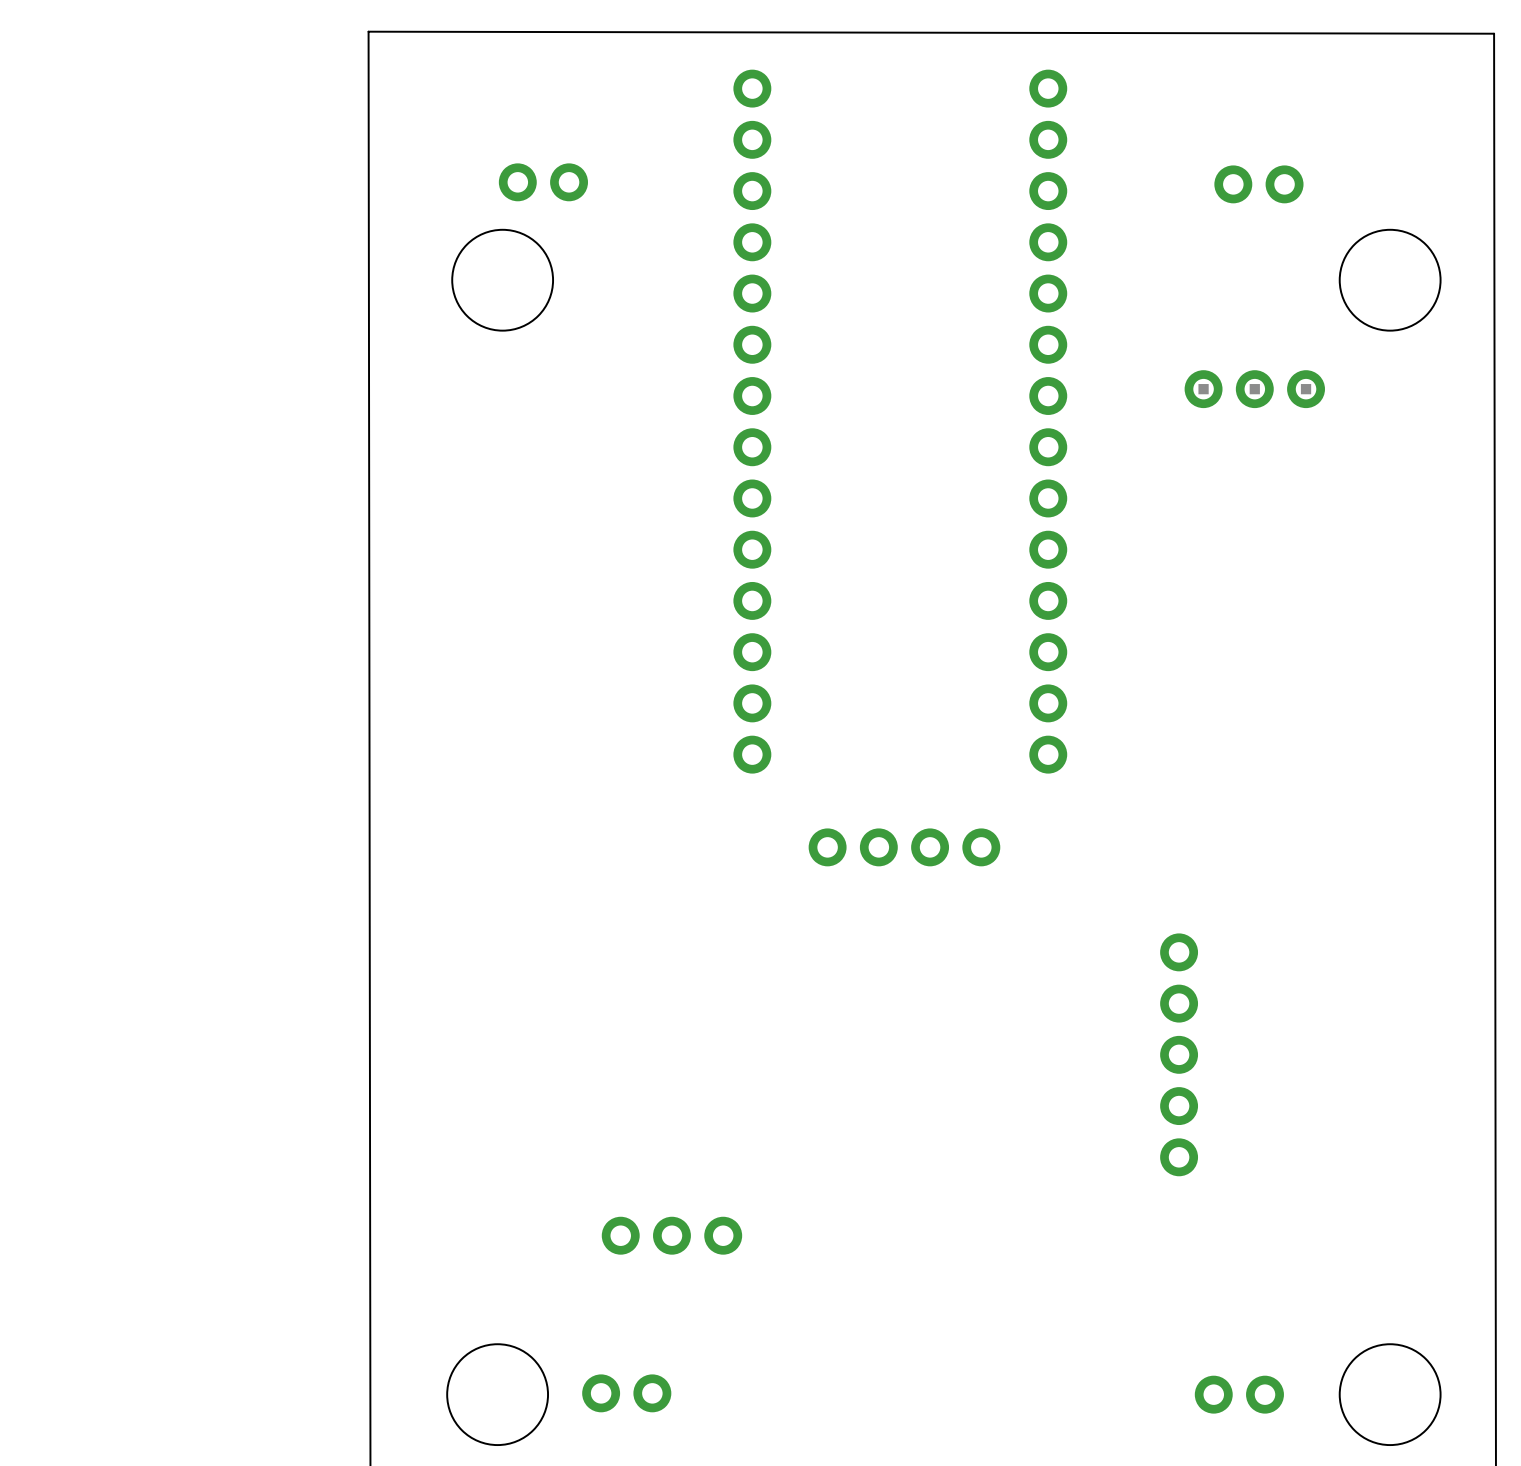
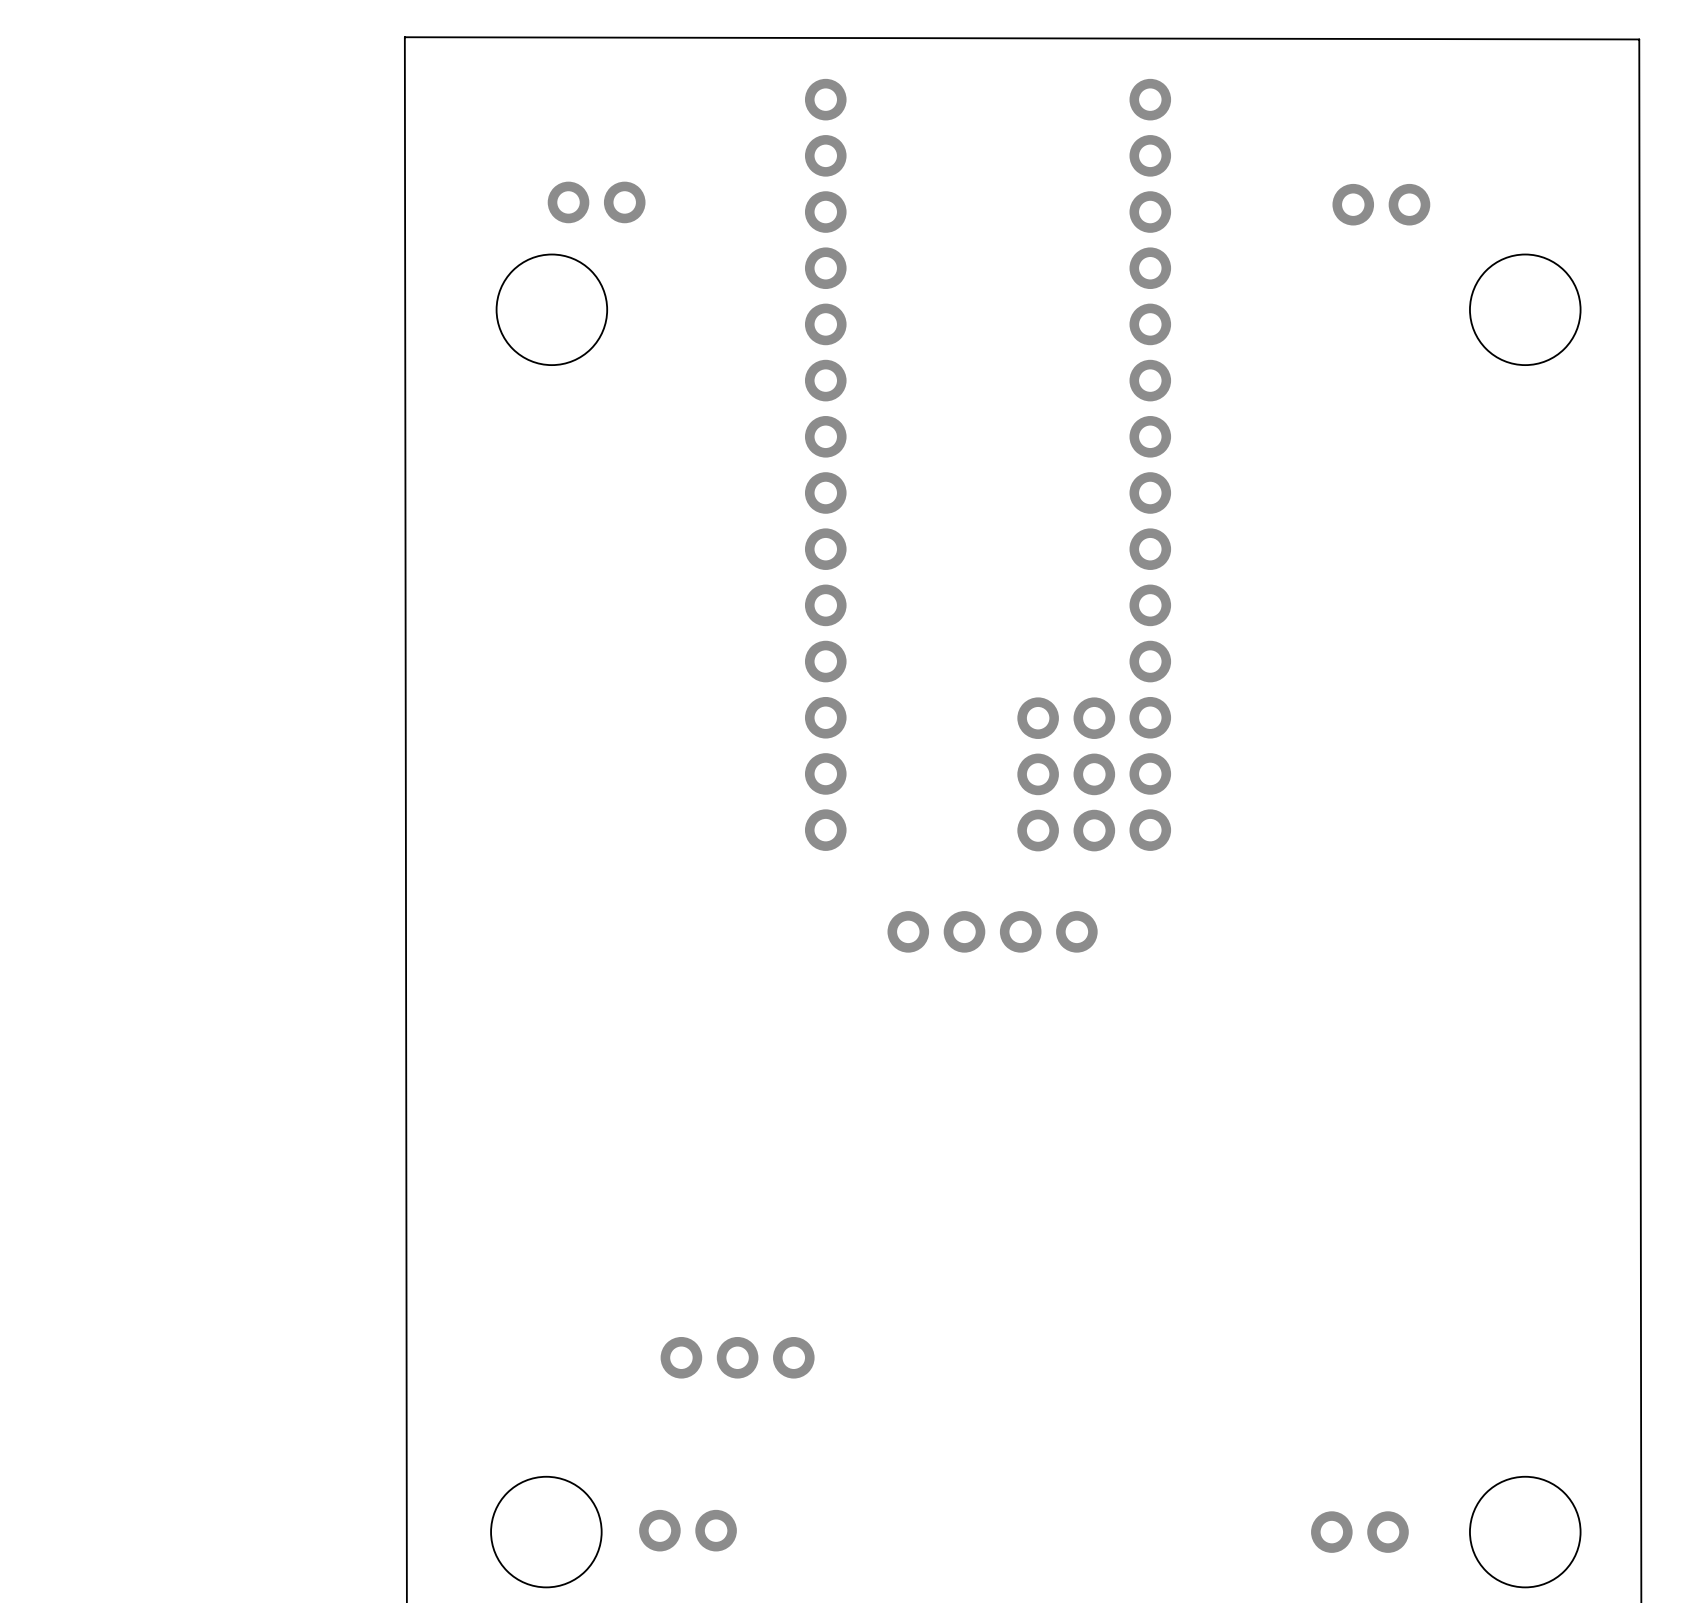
part: (1254, 389) -> none
part: none -> (1066, 774)
part: (1179, 1054) -> none

